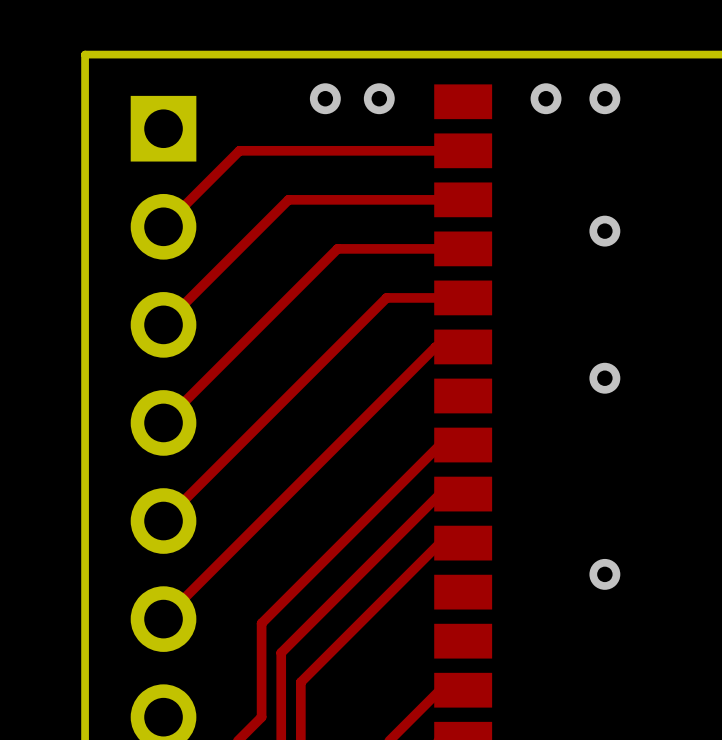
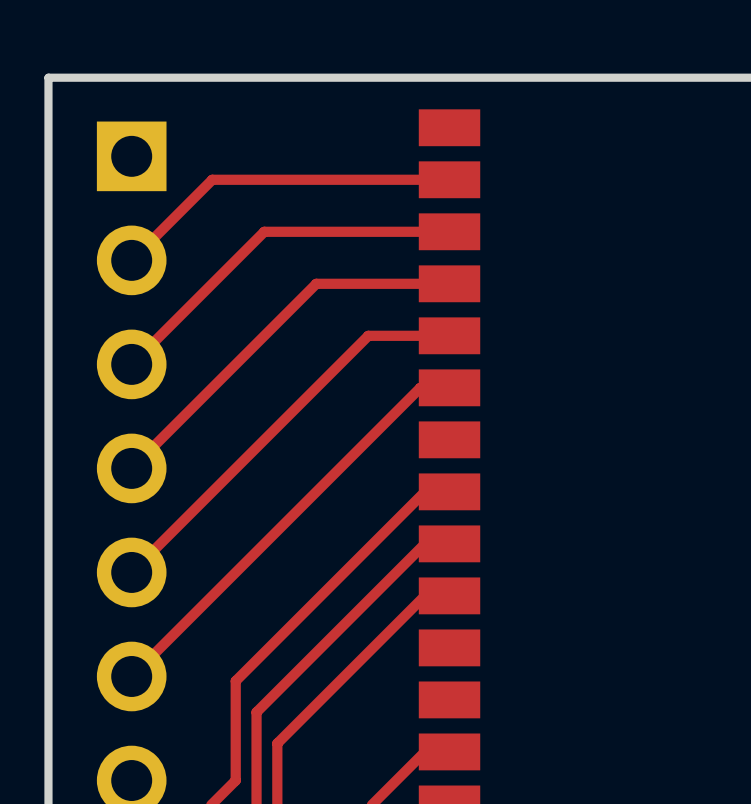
via: (325, 98) -> none
via: (379, 98) -> none
via: (546, 98) -> none
via: (604, 98) -> none
via: (604, 231) -> none
via: (604, 378) -> none
via: (604, 574) -> none

